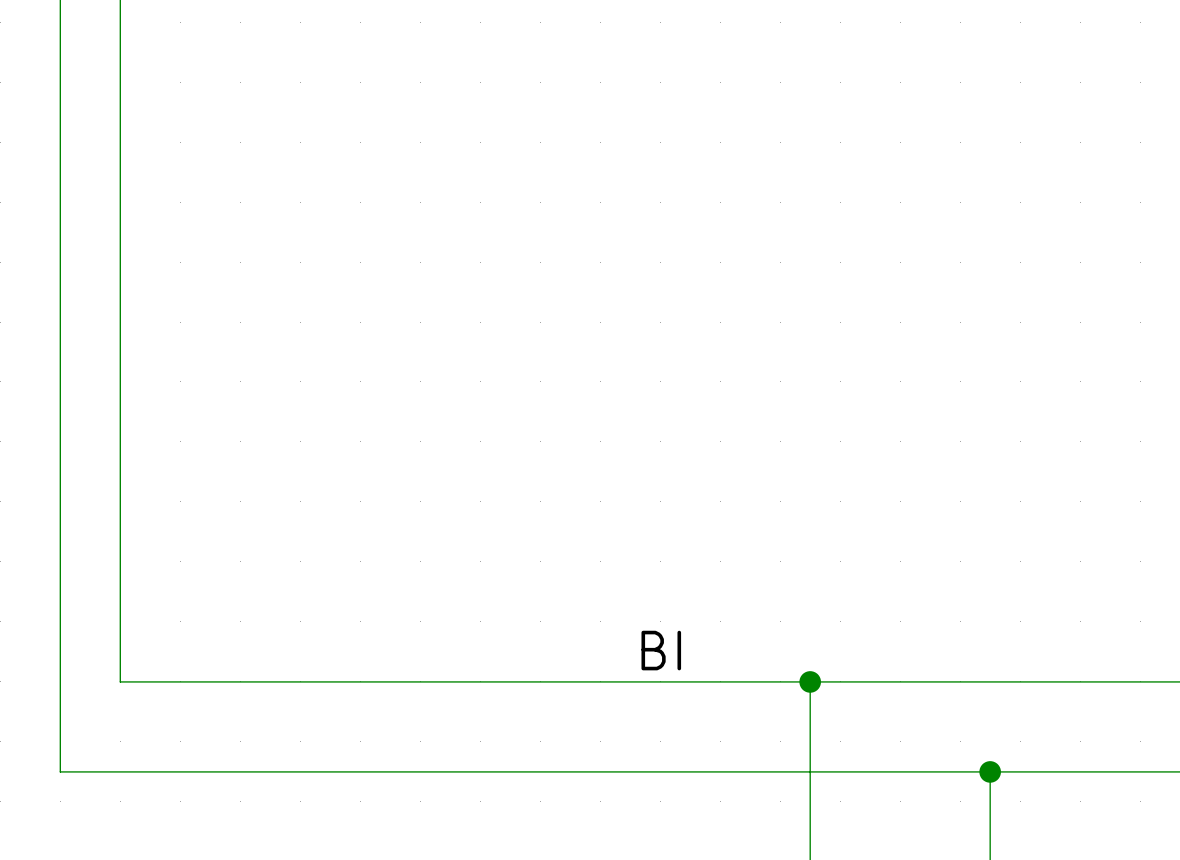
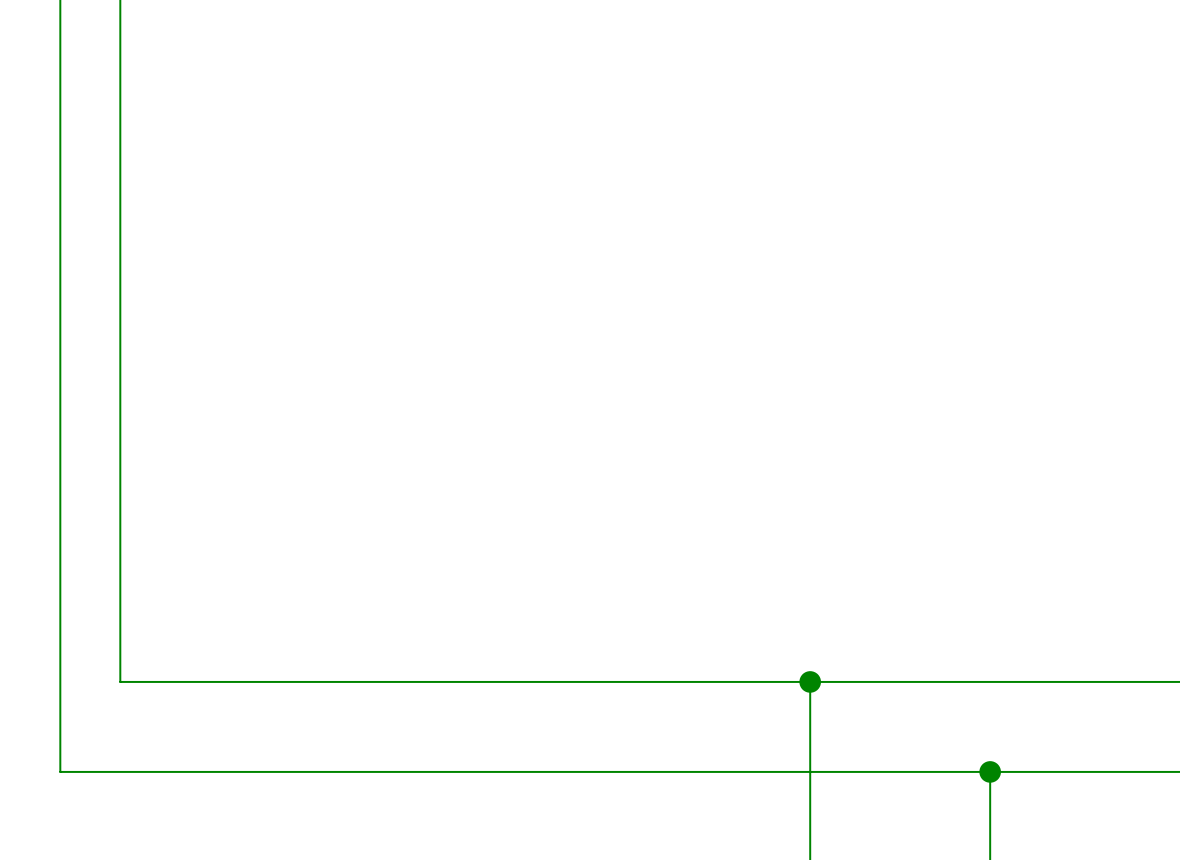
label: BI (661, 650) -> none

